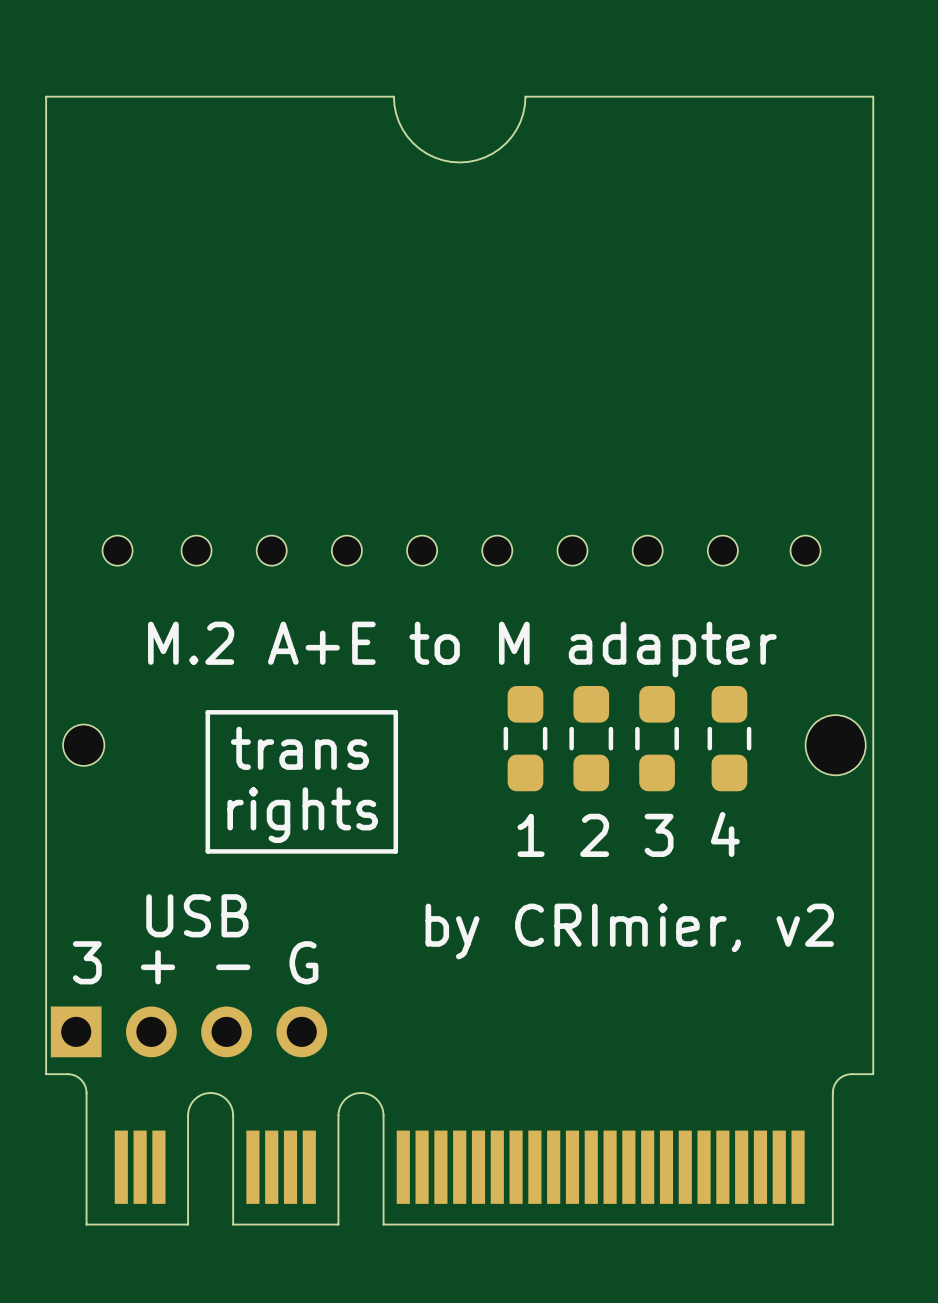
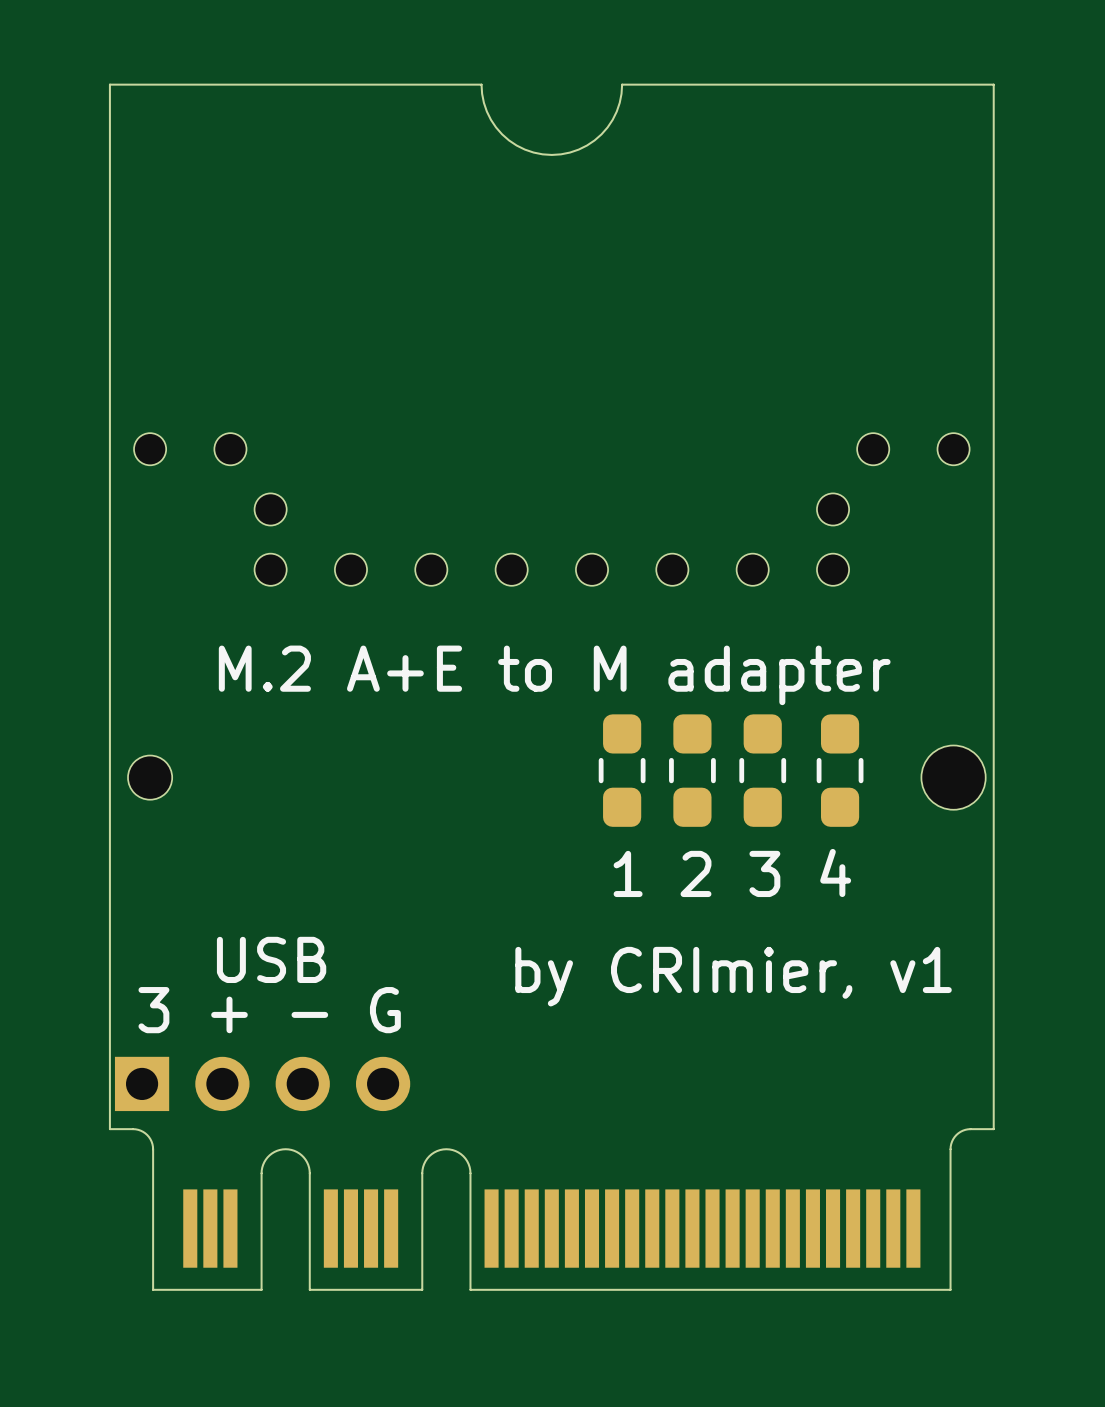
part: none -> (150, 449)
part: none -> (230, 449)
part: none -> (873, 449)
part: none -> (953, 449)
part: none -> (270, 509)
part: none -> (833, 509)
part: (117, 550) -> none
part: (805, 550) -> none
line: (395, 712) (207, 712) (207, 851) (395, 851) (395, 712) -> none
text: trans (300, 748) -> none
text: rights (302, 815) -> none
text: by CRImier, v2 (629, 931) -> by CRImier, v1 (733, 976)

